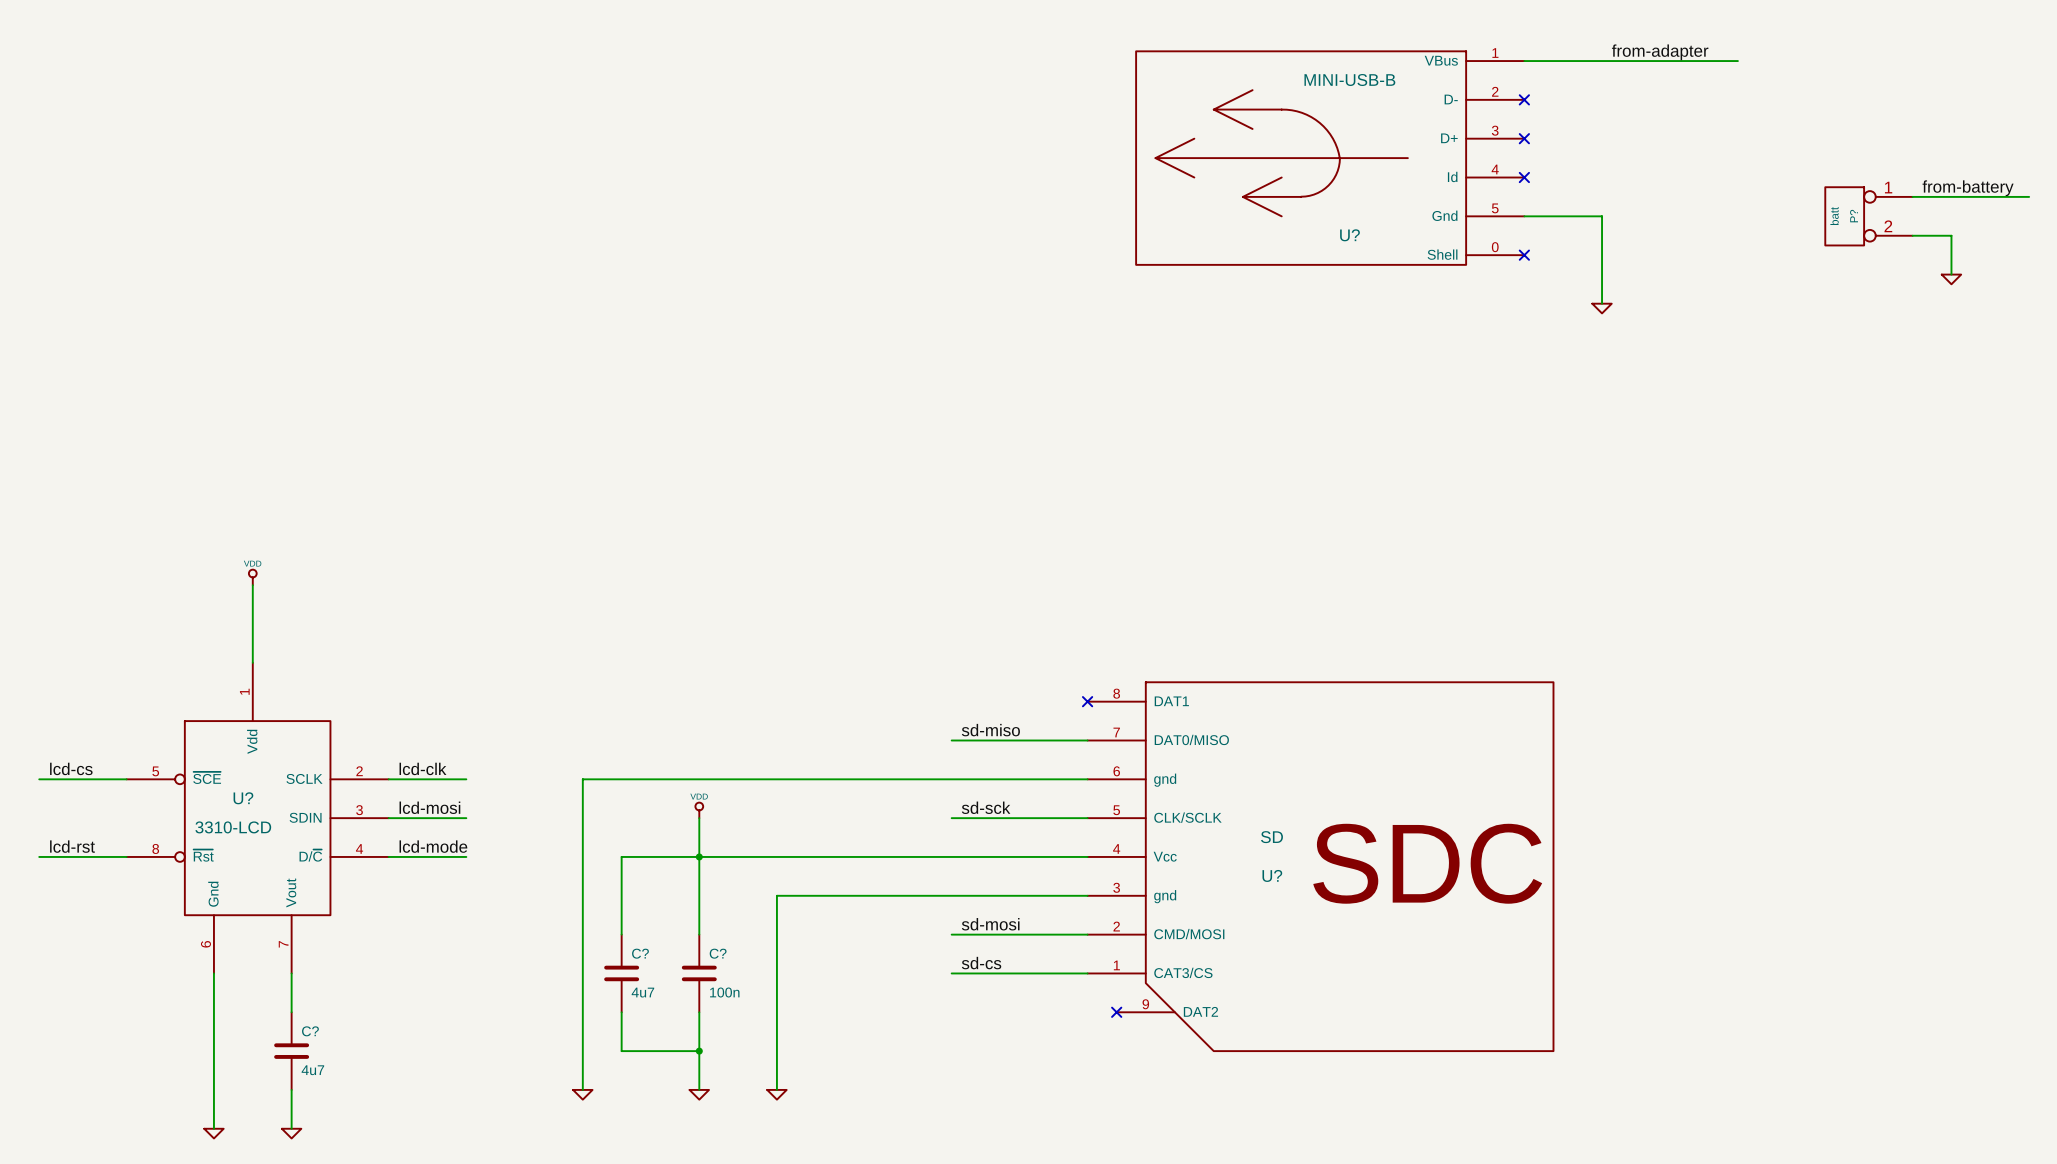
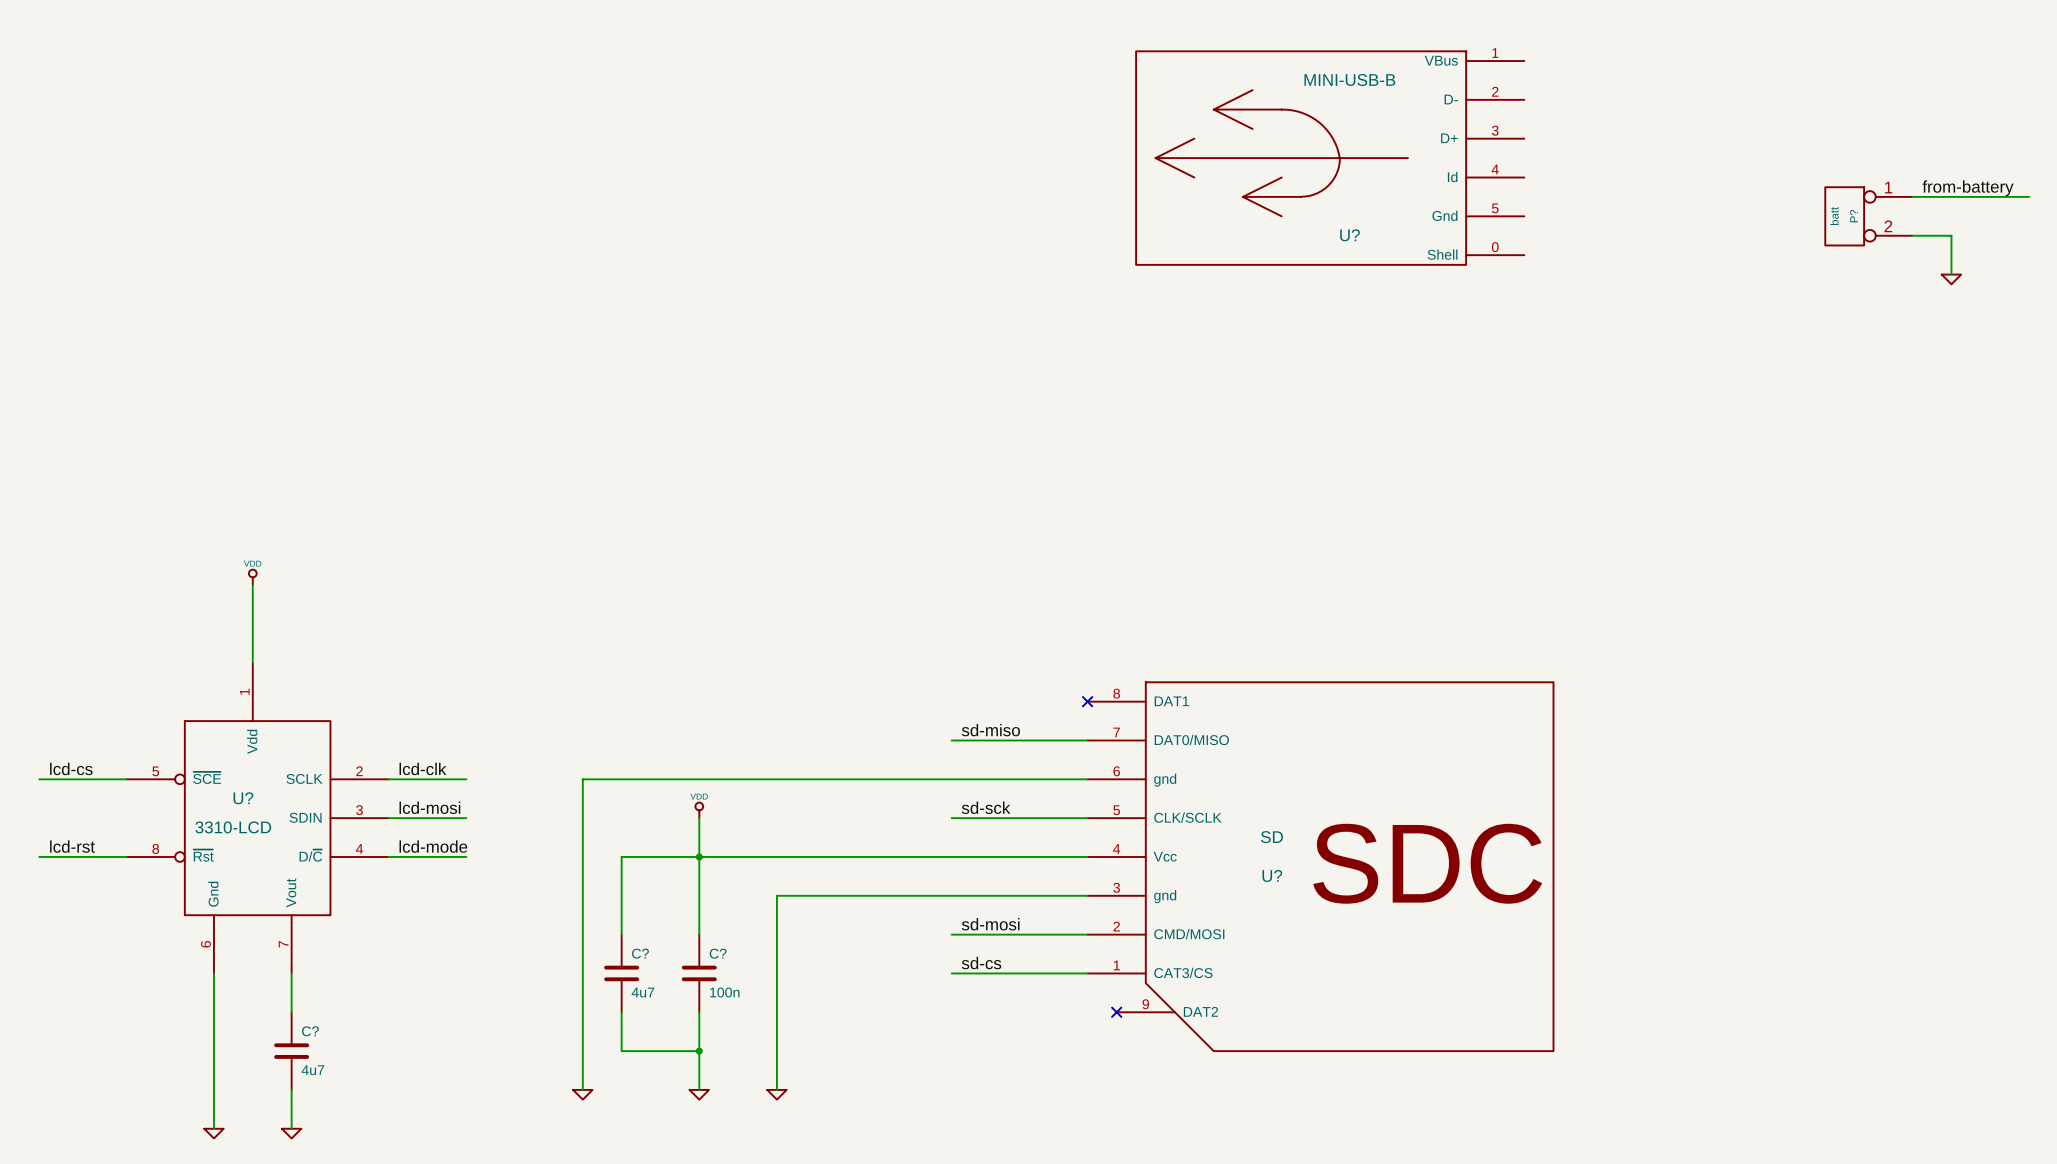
label: from-adapter (1660, 52) -> none
wire: (1524, 61) (1737, 61) -> none
no-connect mark: (1524, 99) -> none
no-connect mark: (1524, 138) -> none
no-connect mark: (1524, 177) -> none
wire: (1524, 216) (1602, 216) (1602, 303) -> none
no-connect mark: (1524, 255) -> none
power symbol: (1602, 308) -> none

